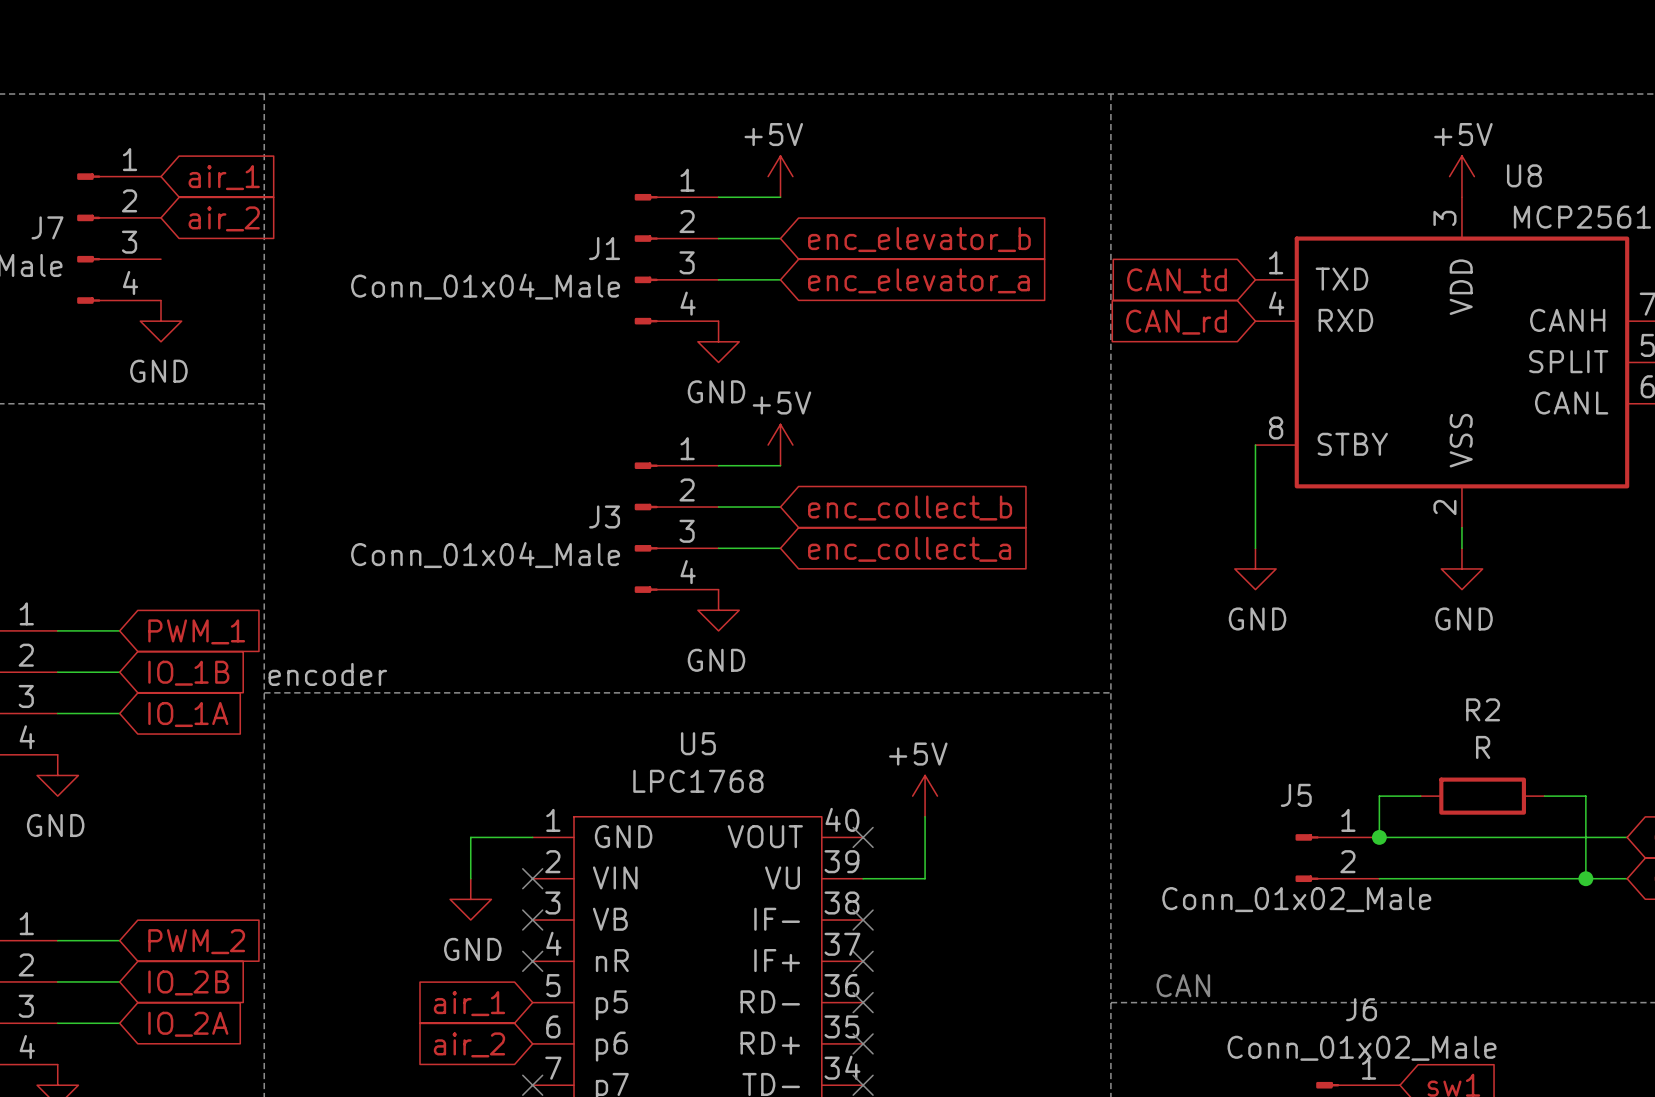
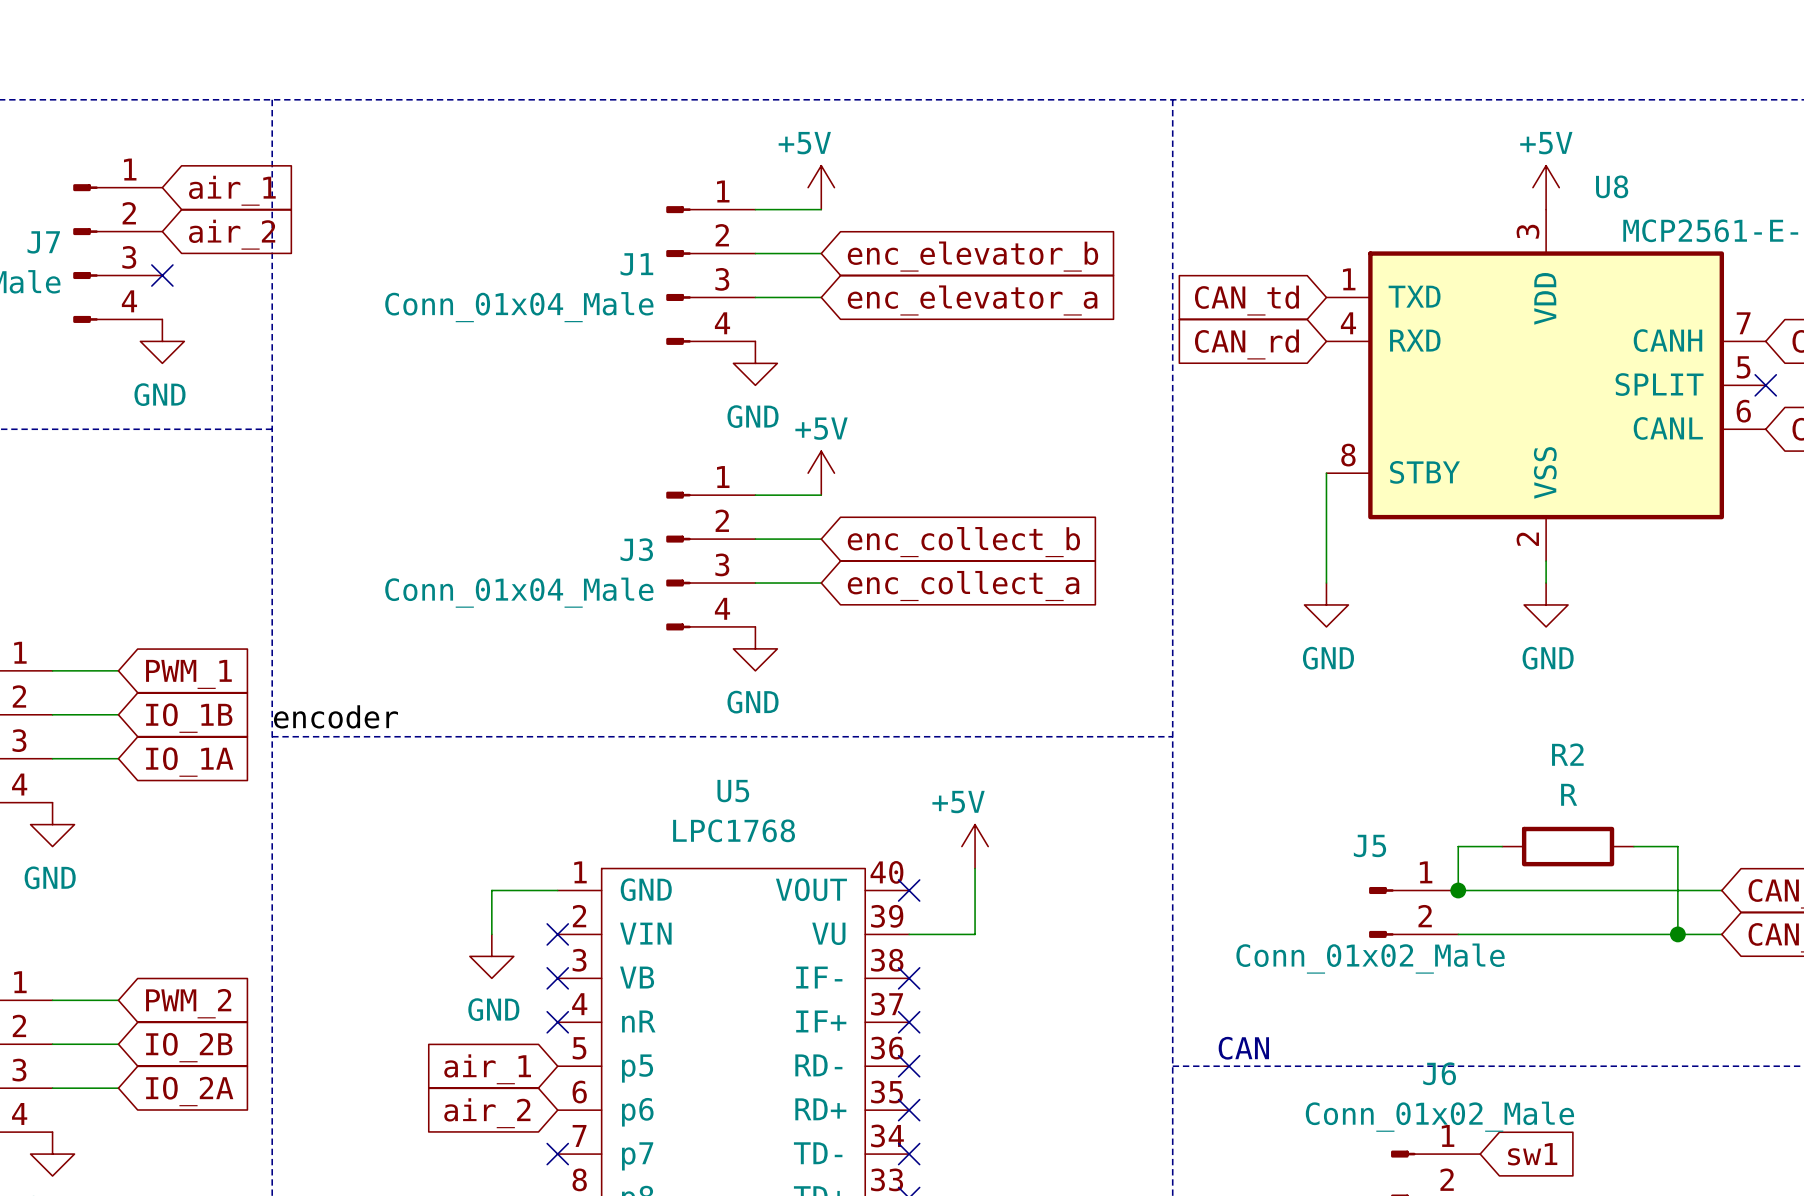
no-connect mark: none -> (162, 275)

